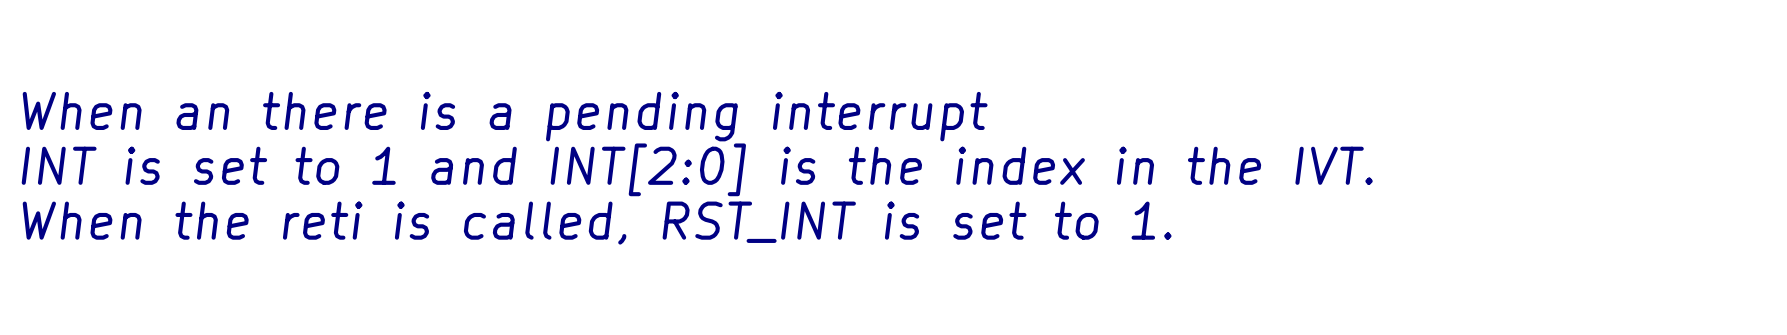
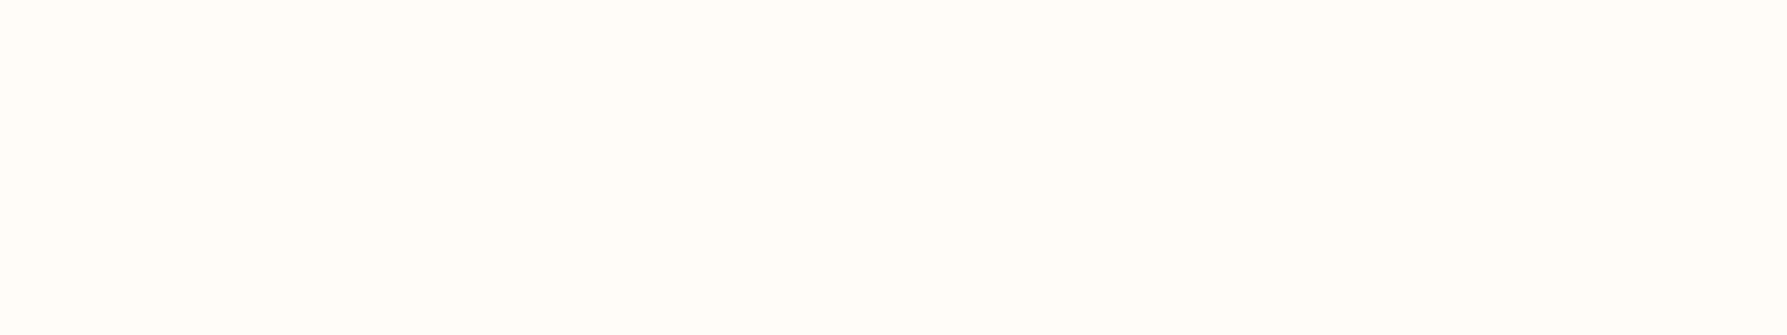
text: When an there is a pending interrupt (505, 116) -> none
text: INT is set to 1 and INT[2:0] is the index in the IVT. (697, 169) -> none
text: When the reti is called, RST_INT is set to 1. (597, 223) -> none

